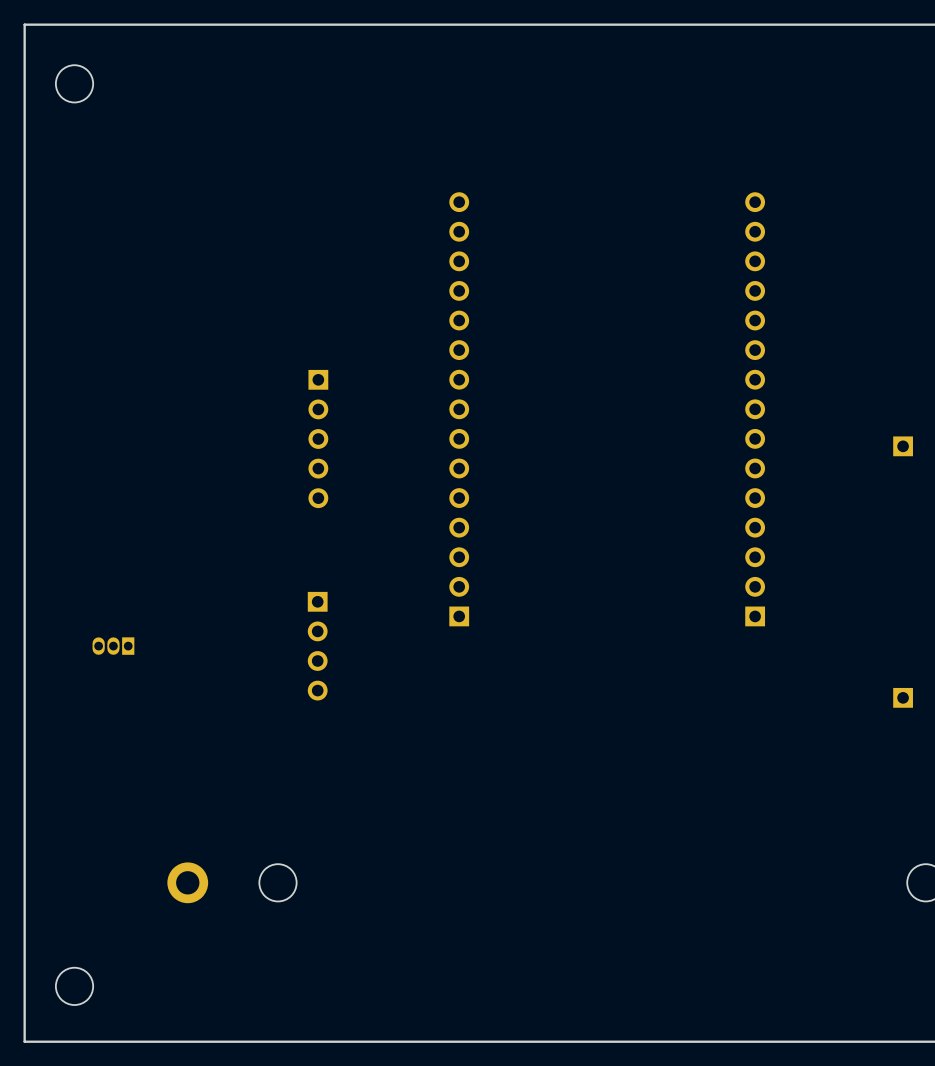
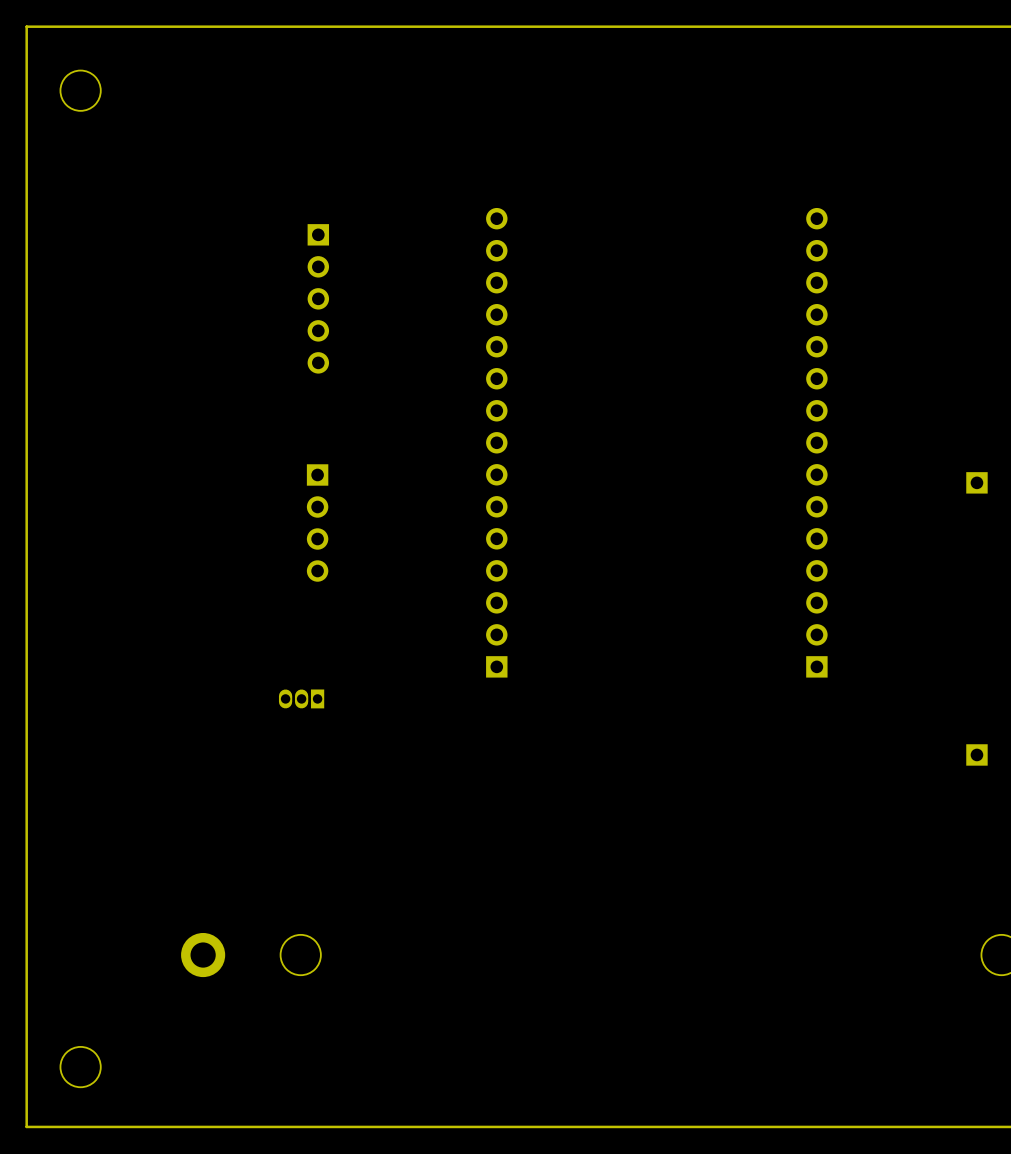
part position: (318, 439) -> (318, 298)
part position: (113, 646) -> (301, 698)
part position: (317, 646) -> (317, 522)

